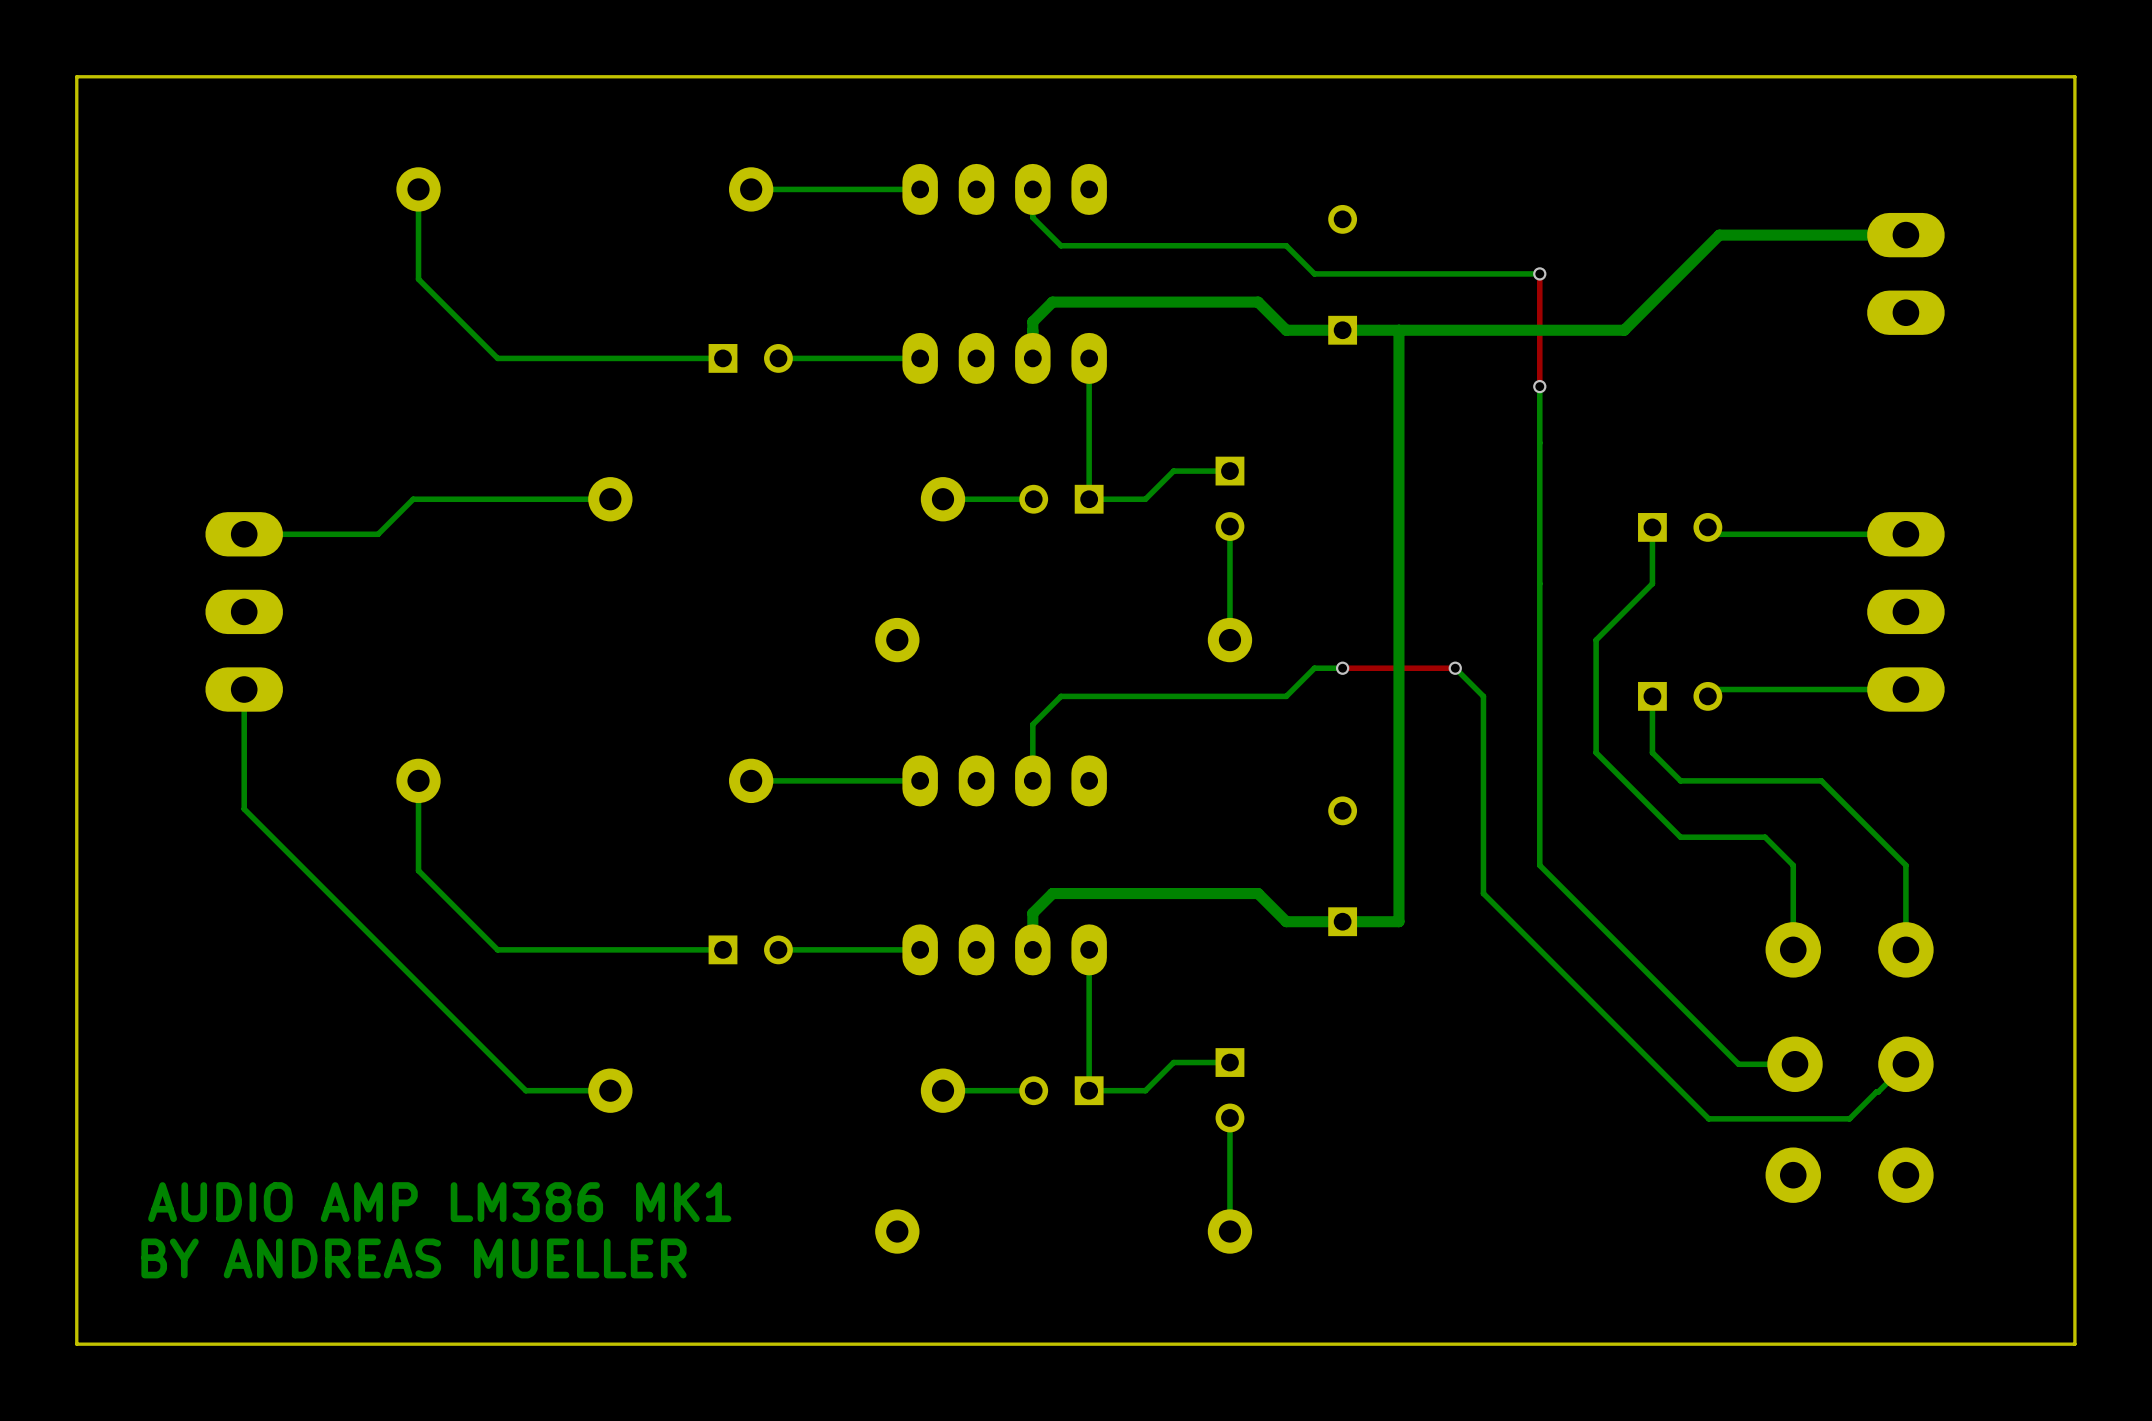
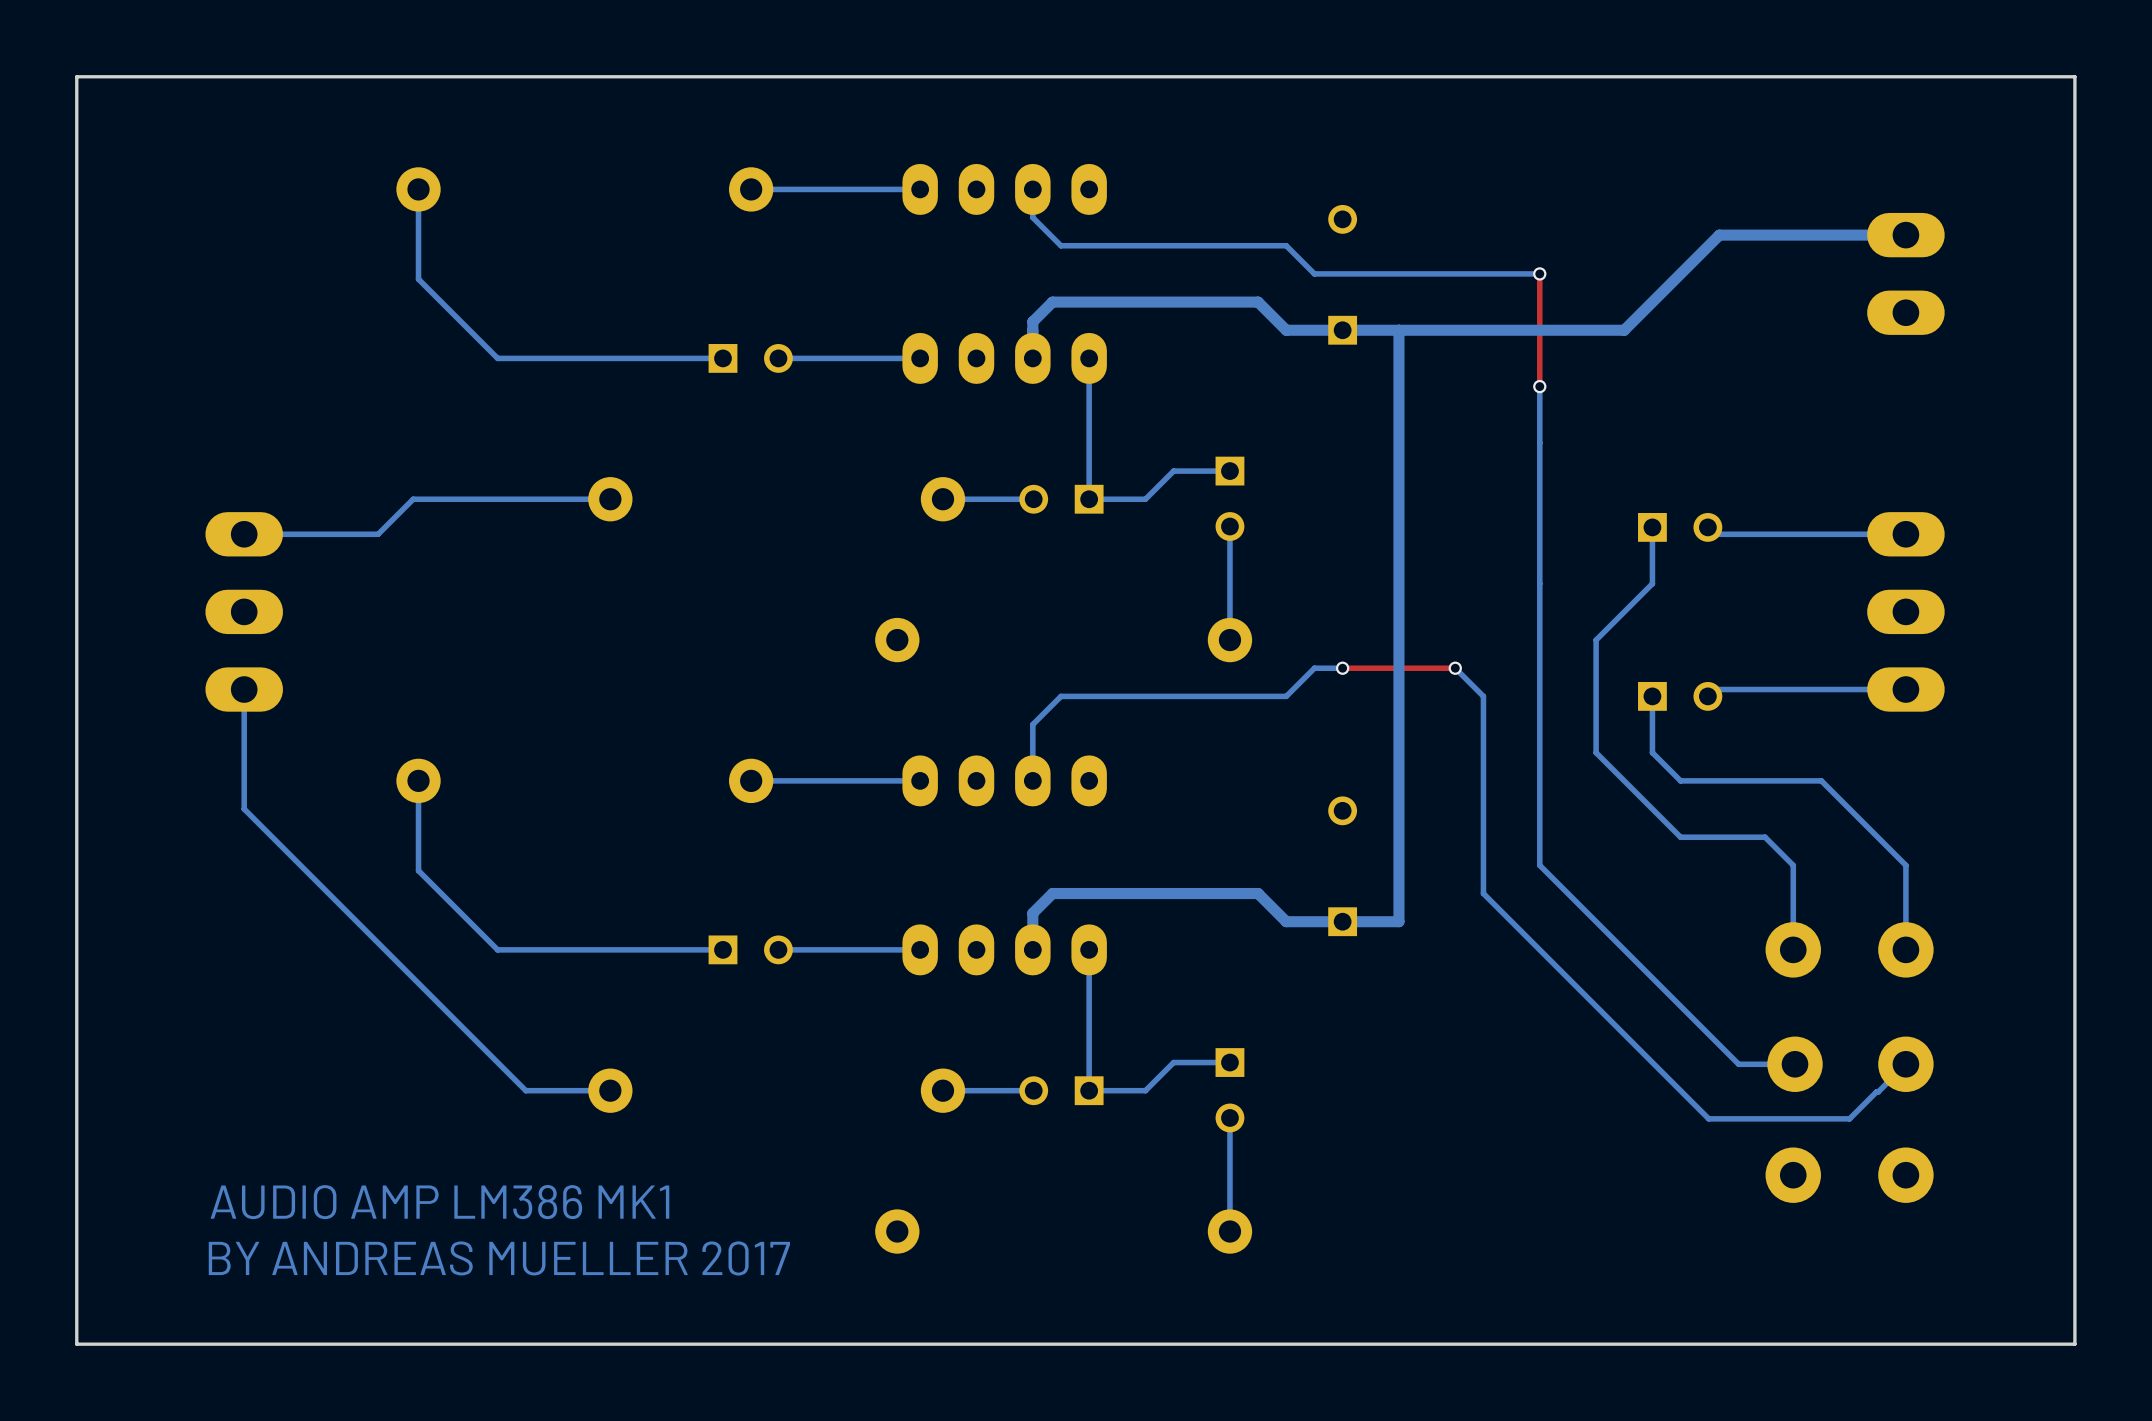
text: BY ANDREAS MUELLER (413, 1258) -> BY ANDREAS MUELLER 2017 (499, 1258)

